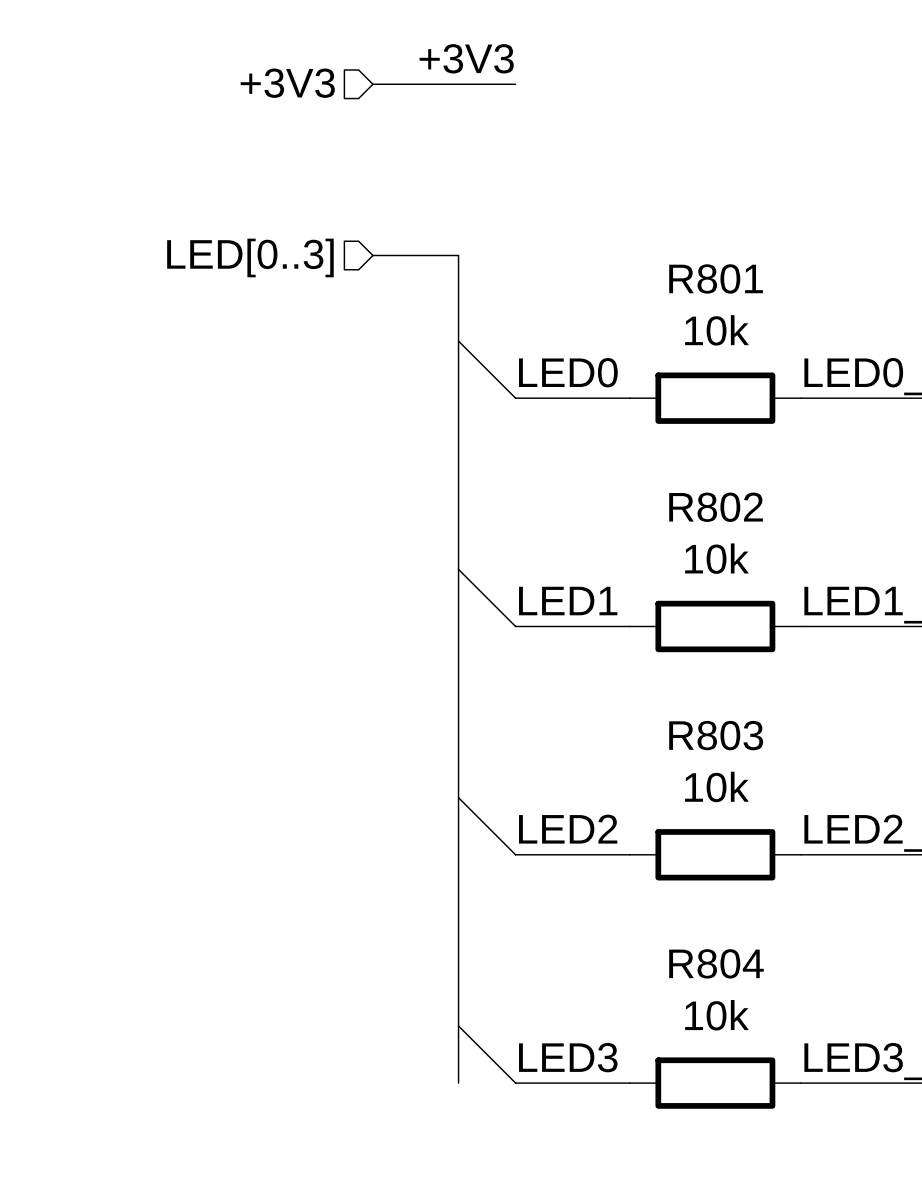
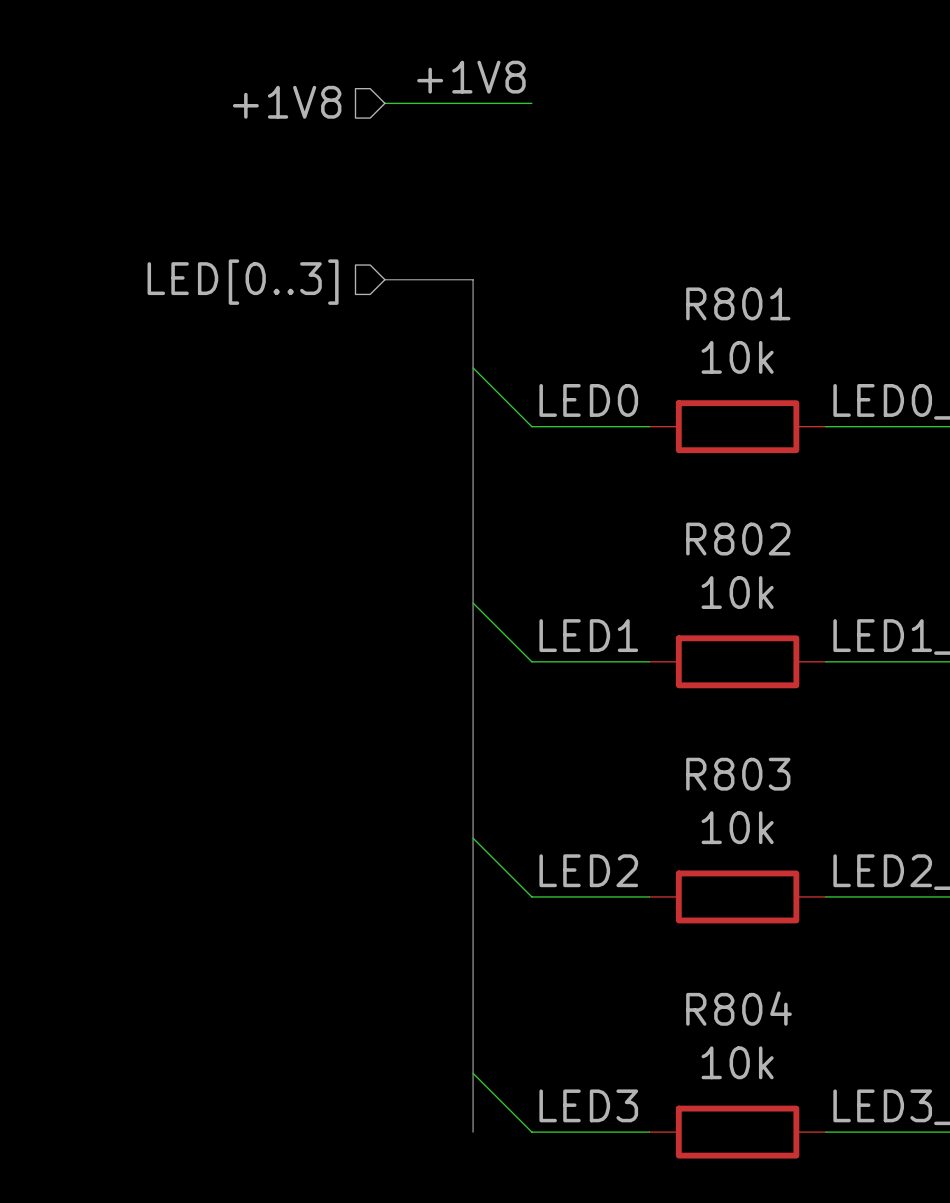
label: +3V3 (466, 58) -> +1V8 (471, 77)
hierarchical label: +3V3 (287, 83) -> +1V8 (287, 102)

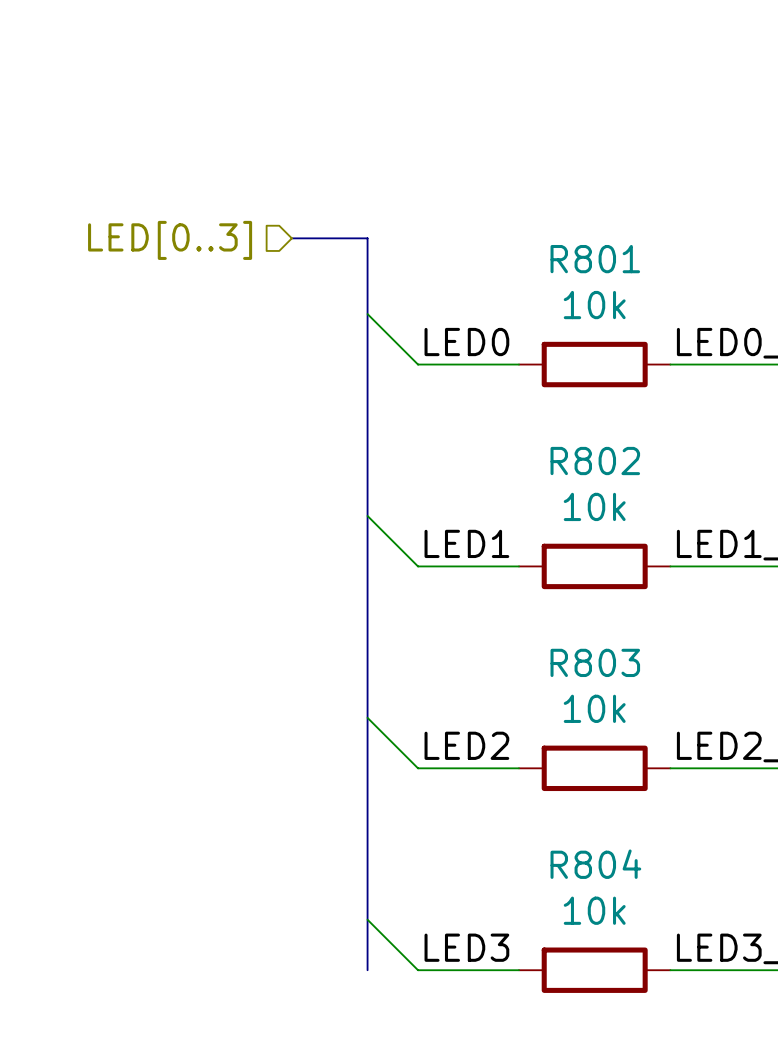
label: +1V8 (471, 77) -> none
hierarchical label: +1V8 (287, 102) -> none
wire: (384, 103) (531, 103) -> none

